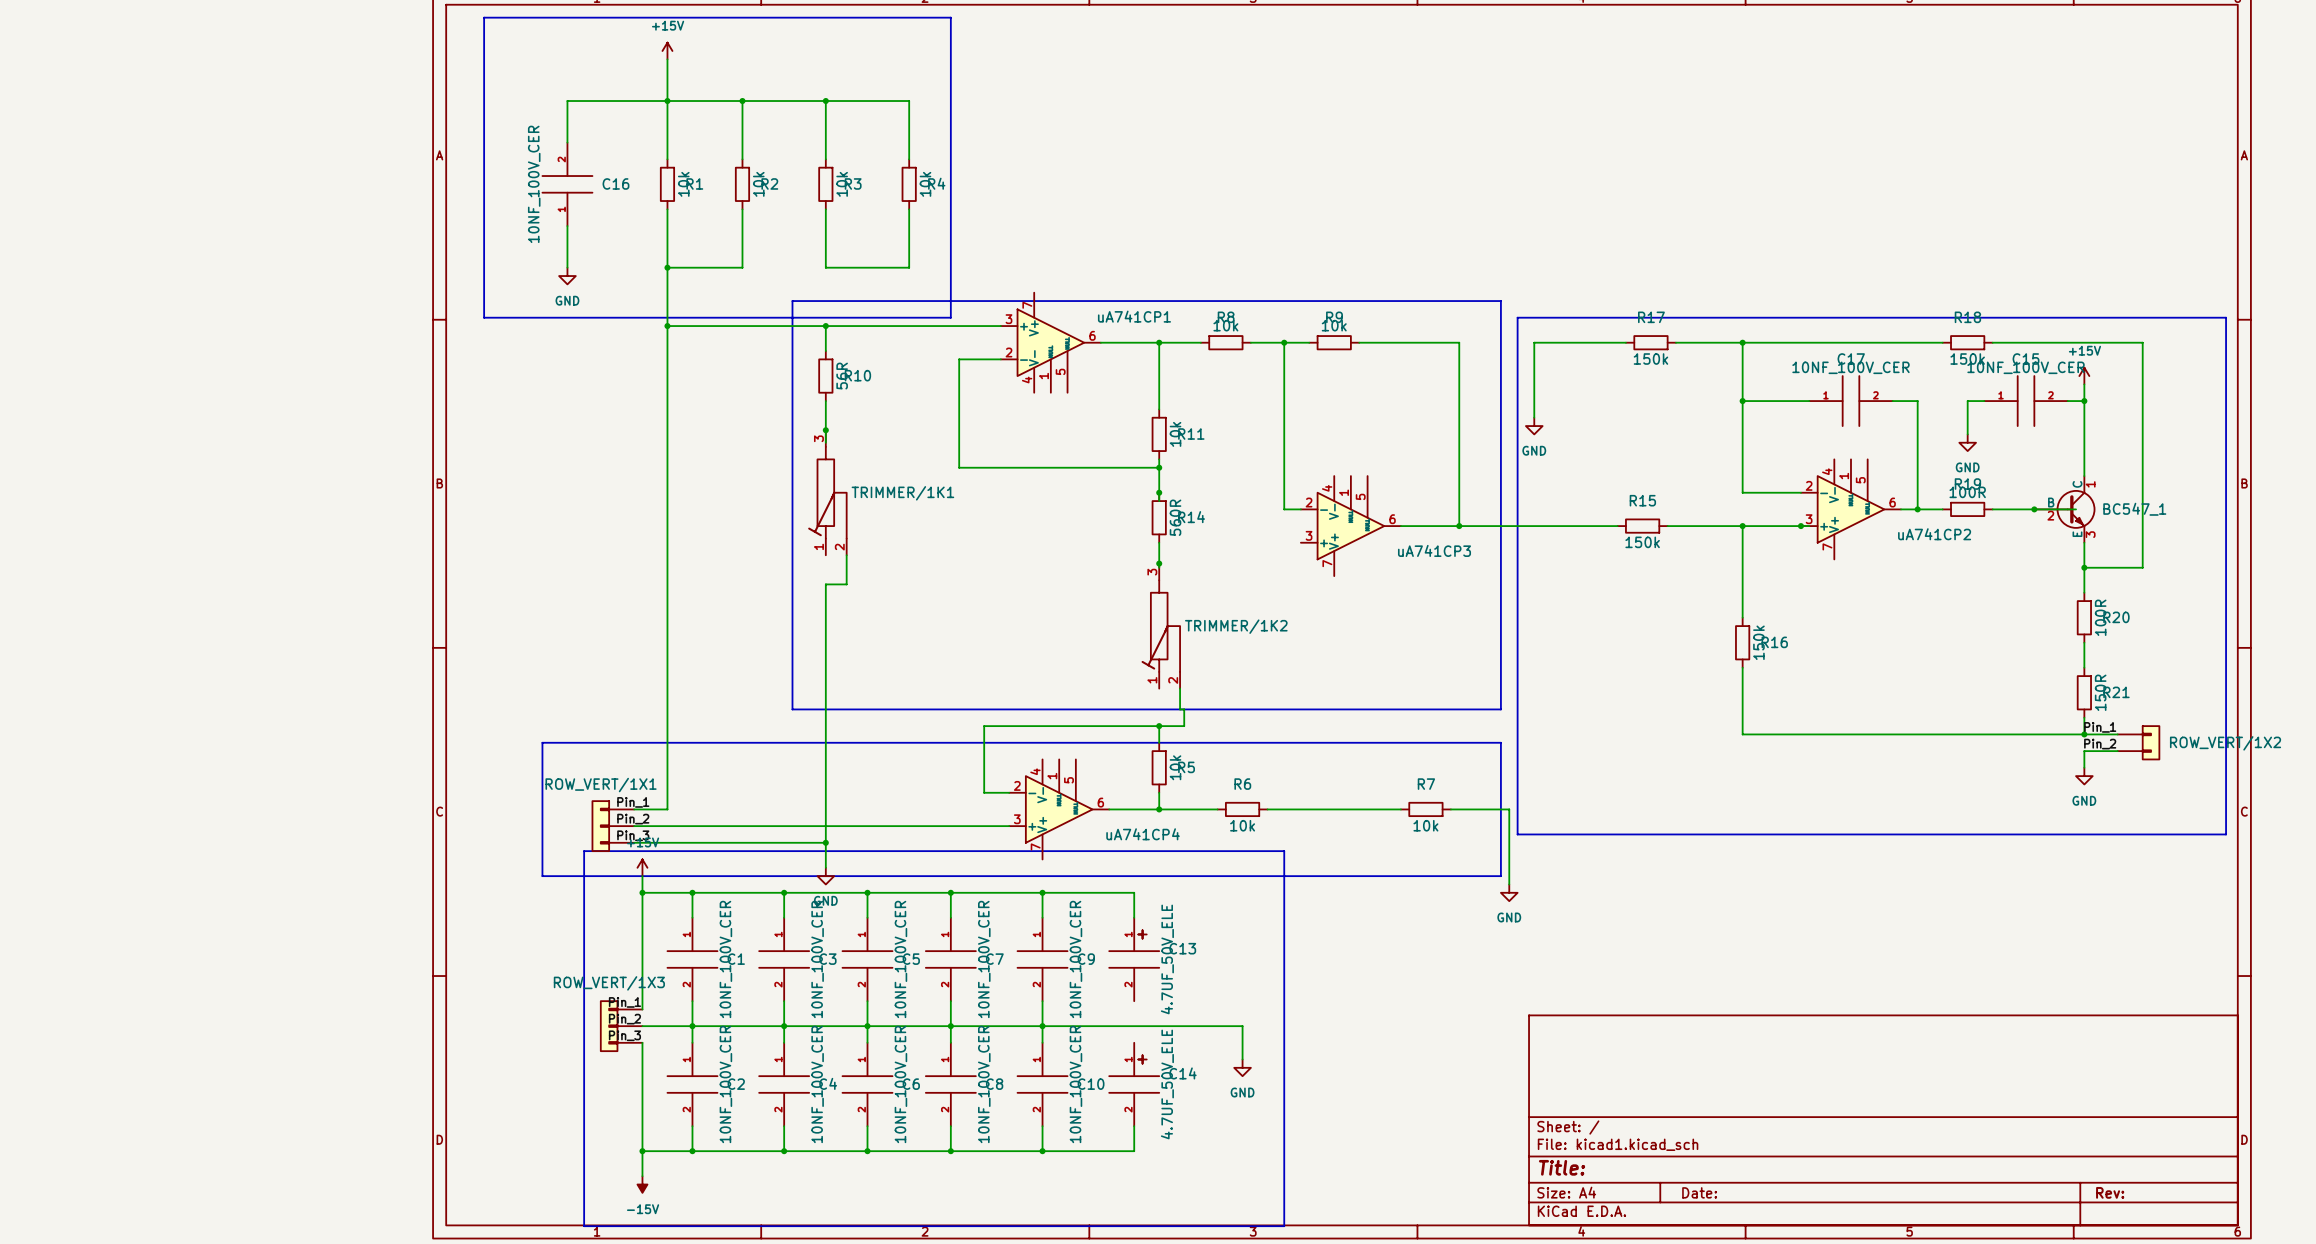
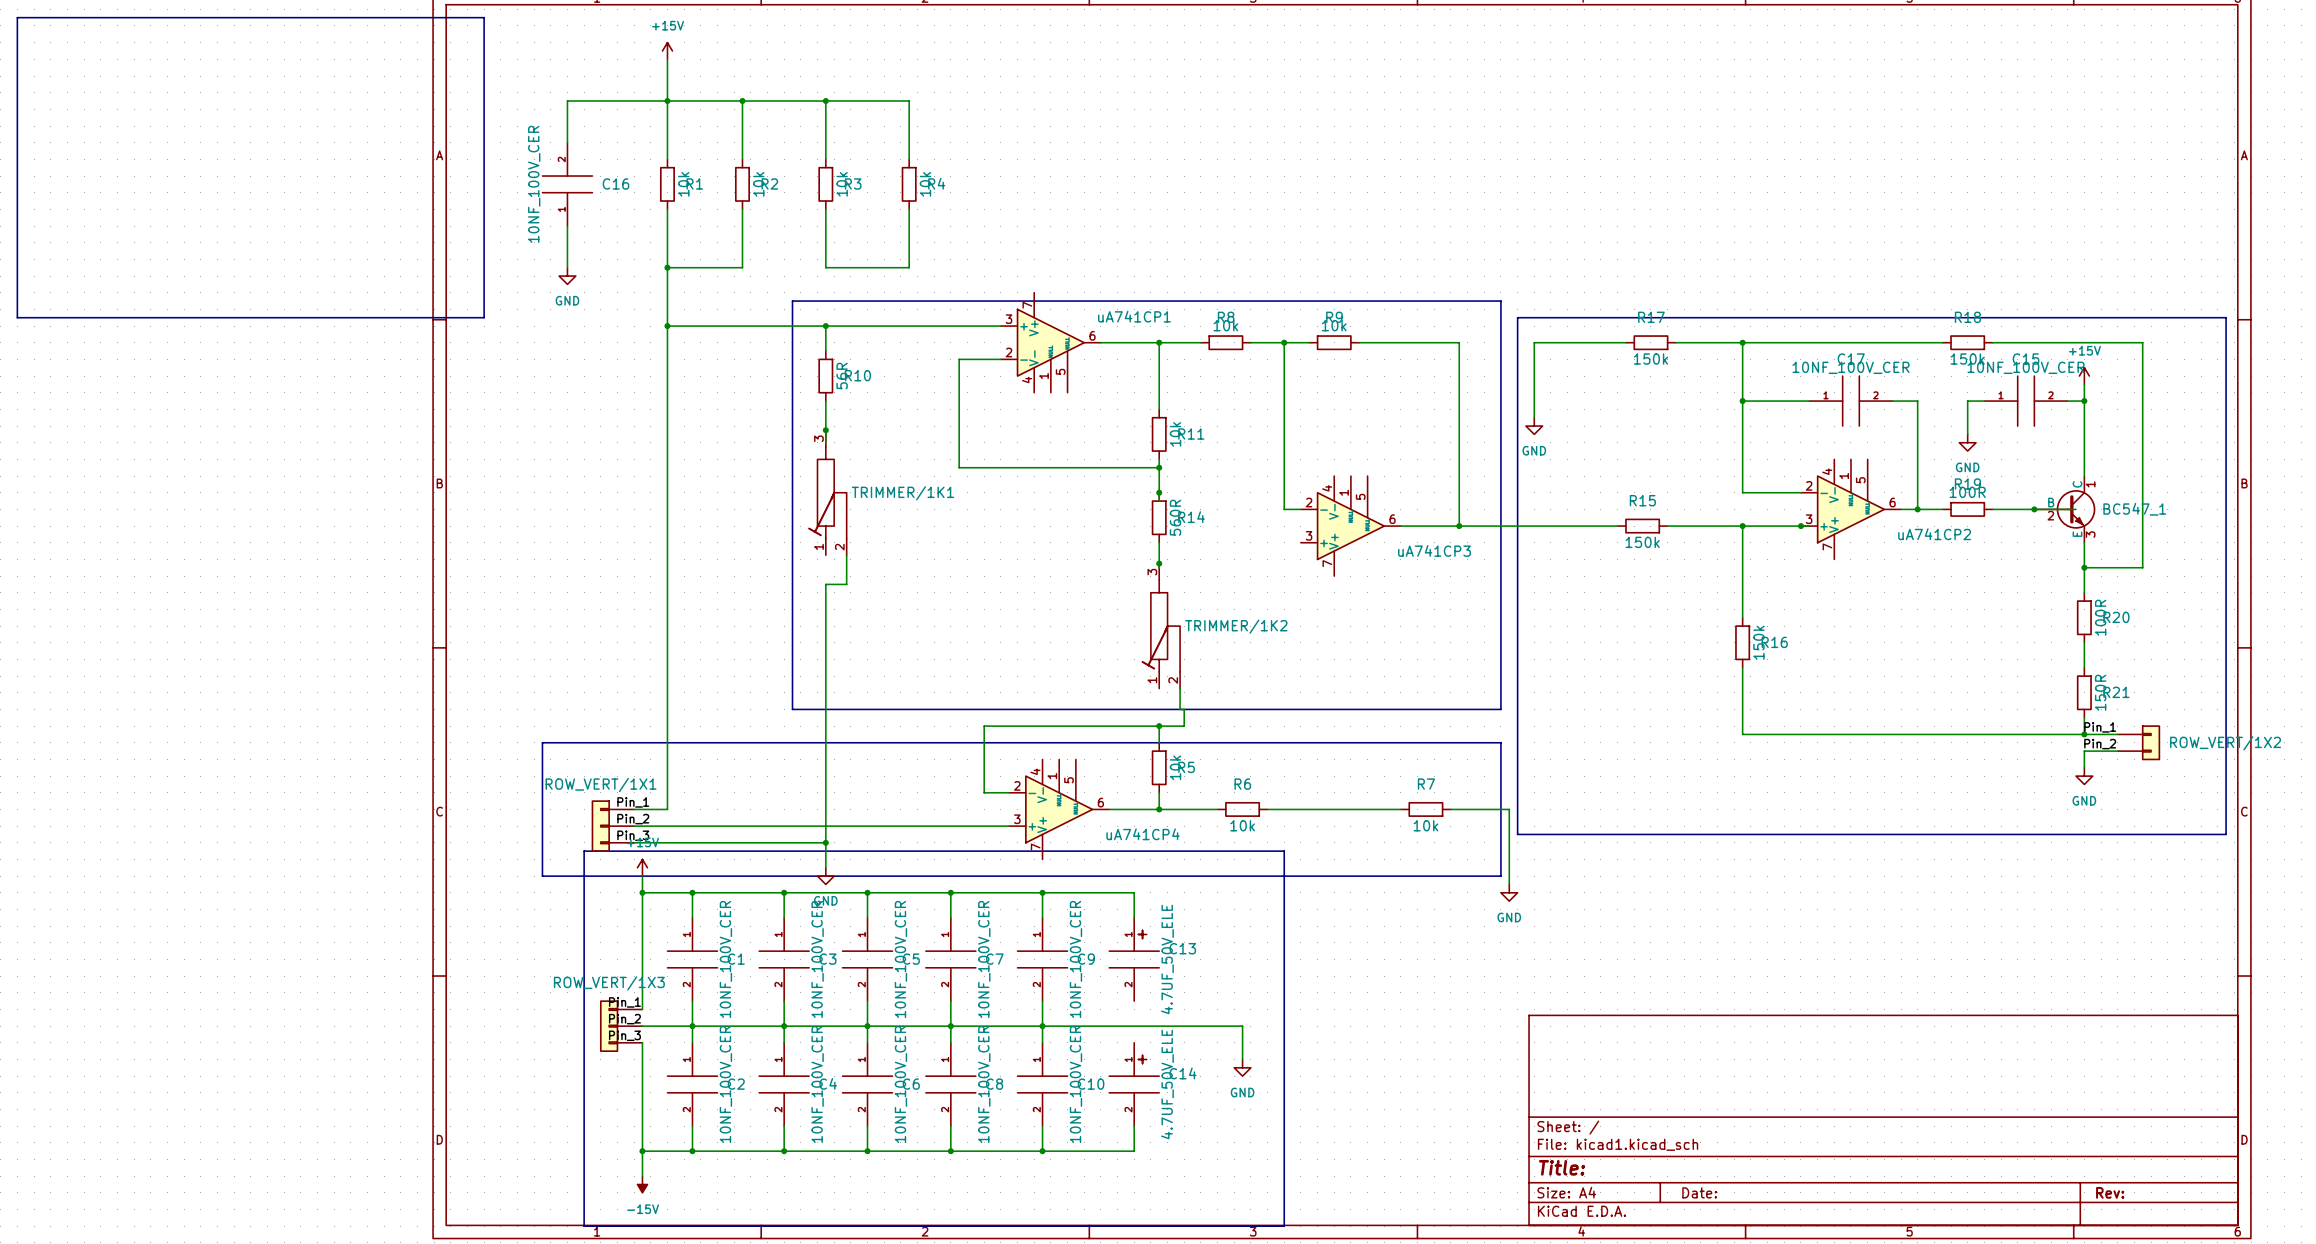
line: (484, 17) (950, 17) (950, 317) (484, 317) -> (484, 17) (17, 17) (17, 317) (484, 317)

